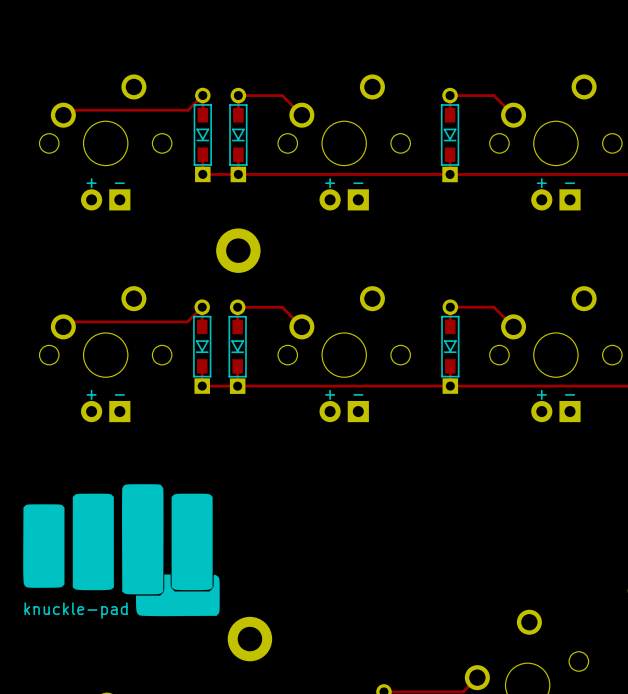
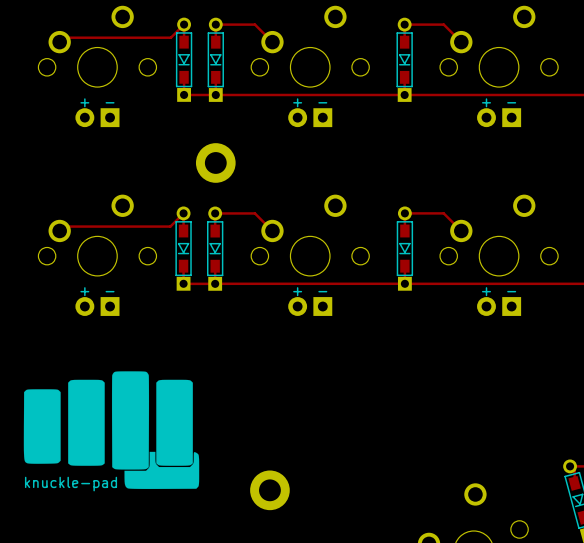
part position: (249, 639) -> (269, 490)

